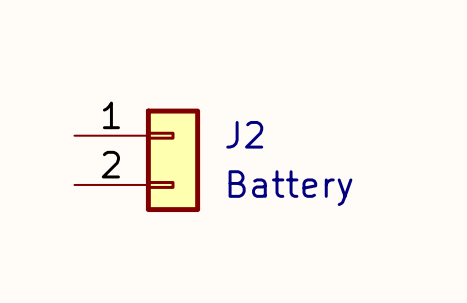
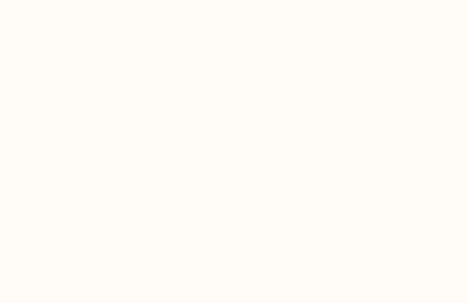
J2: Battery (137, 160) -> none

